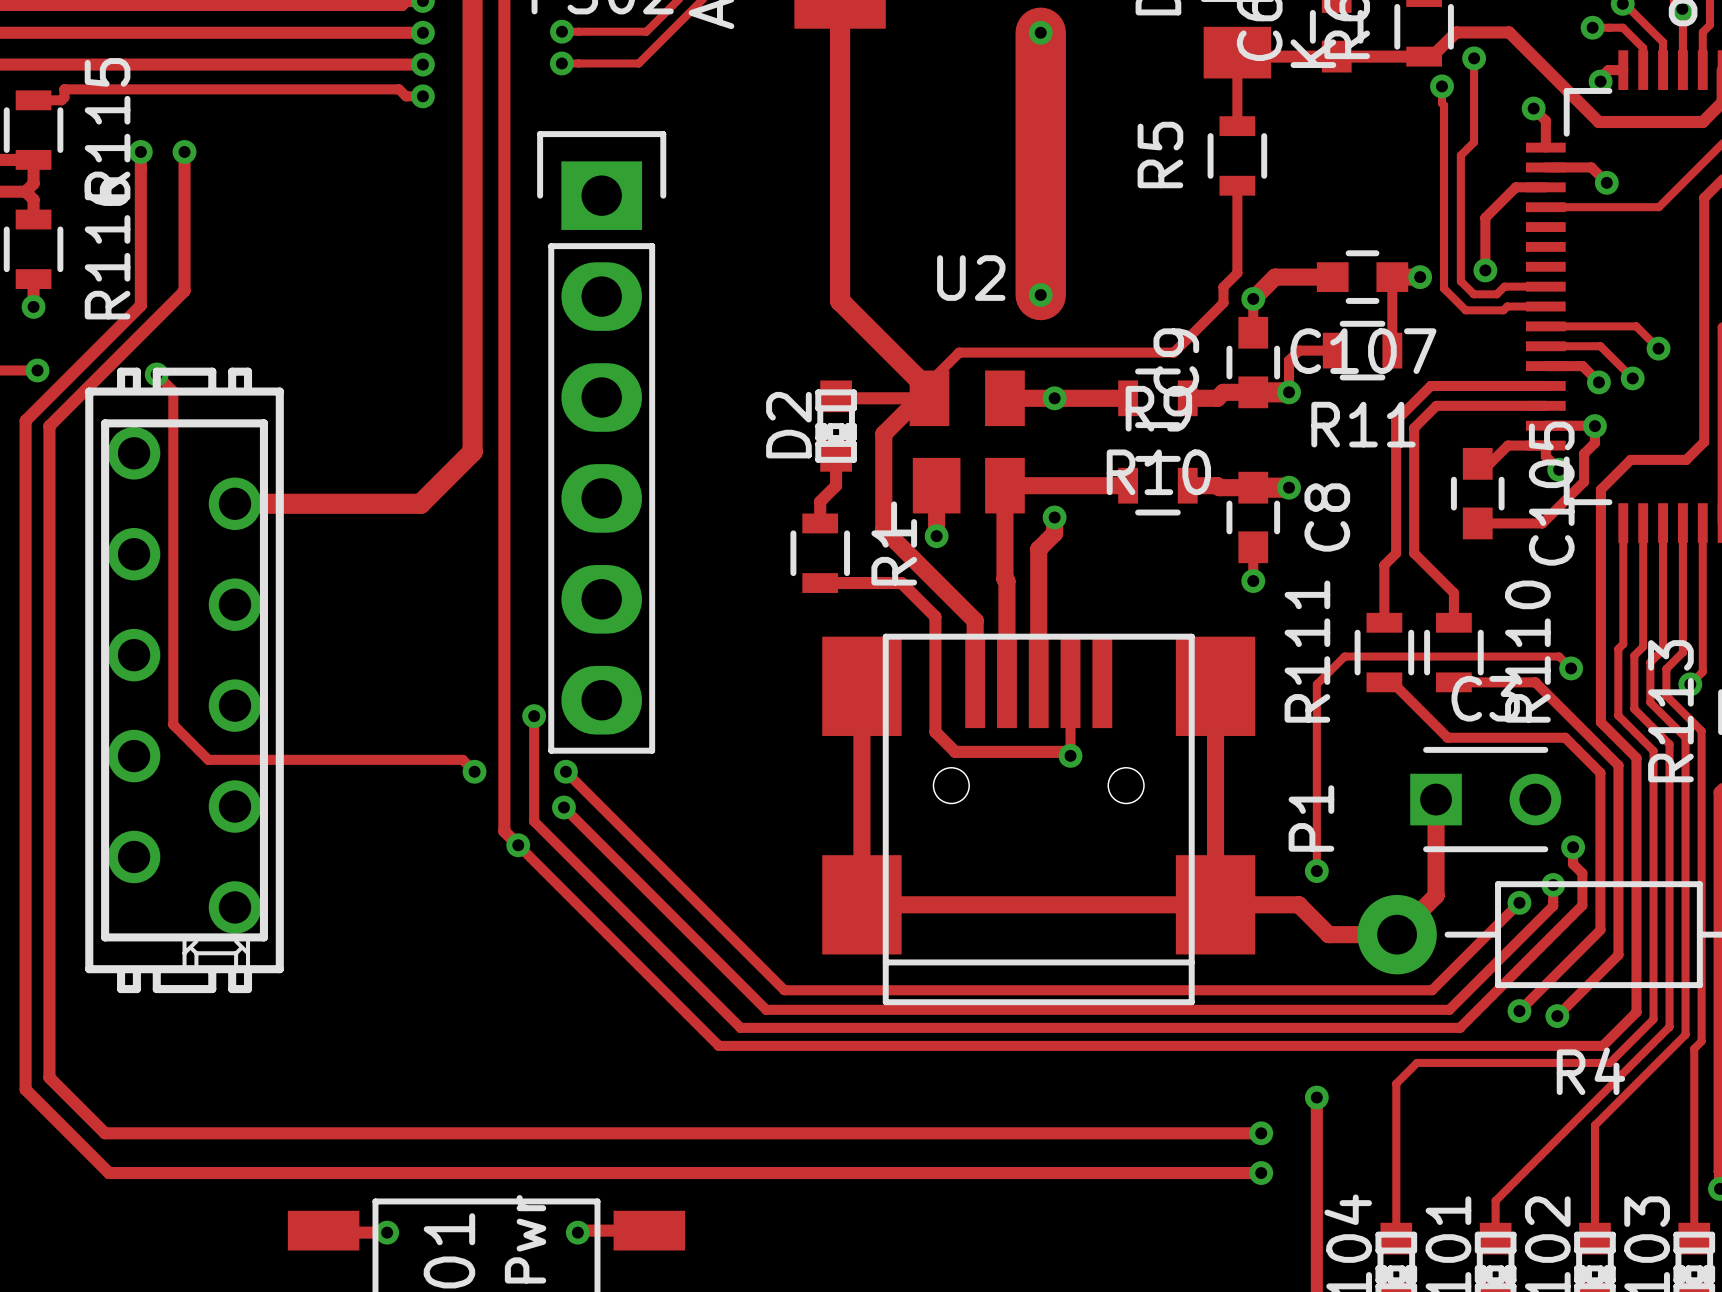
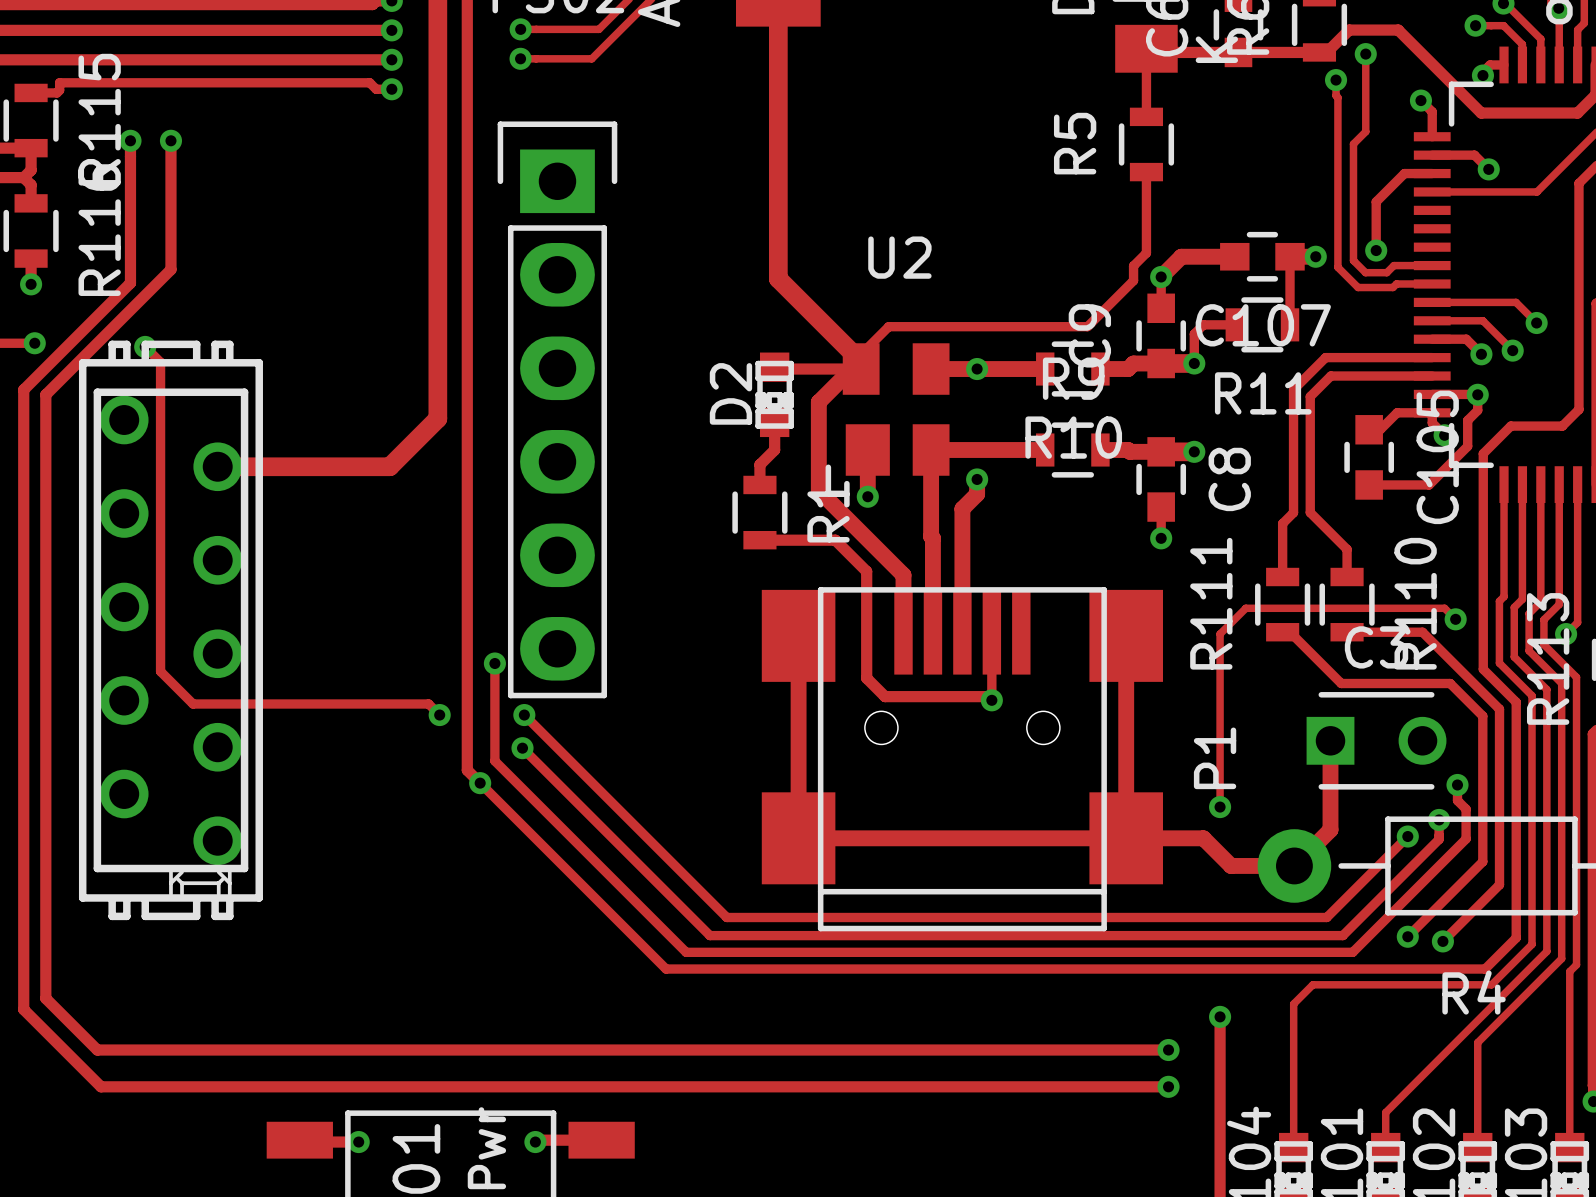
track: (1040, 32) (1040, 294) -> none
via: (1040, 32) -> none
via: (1040, 294) -> none

